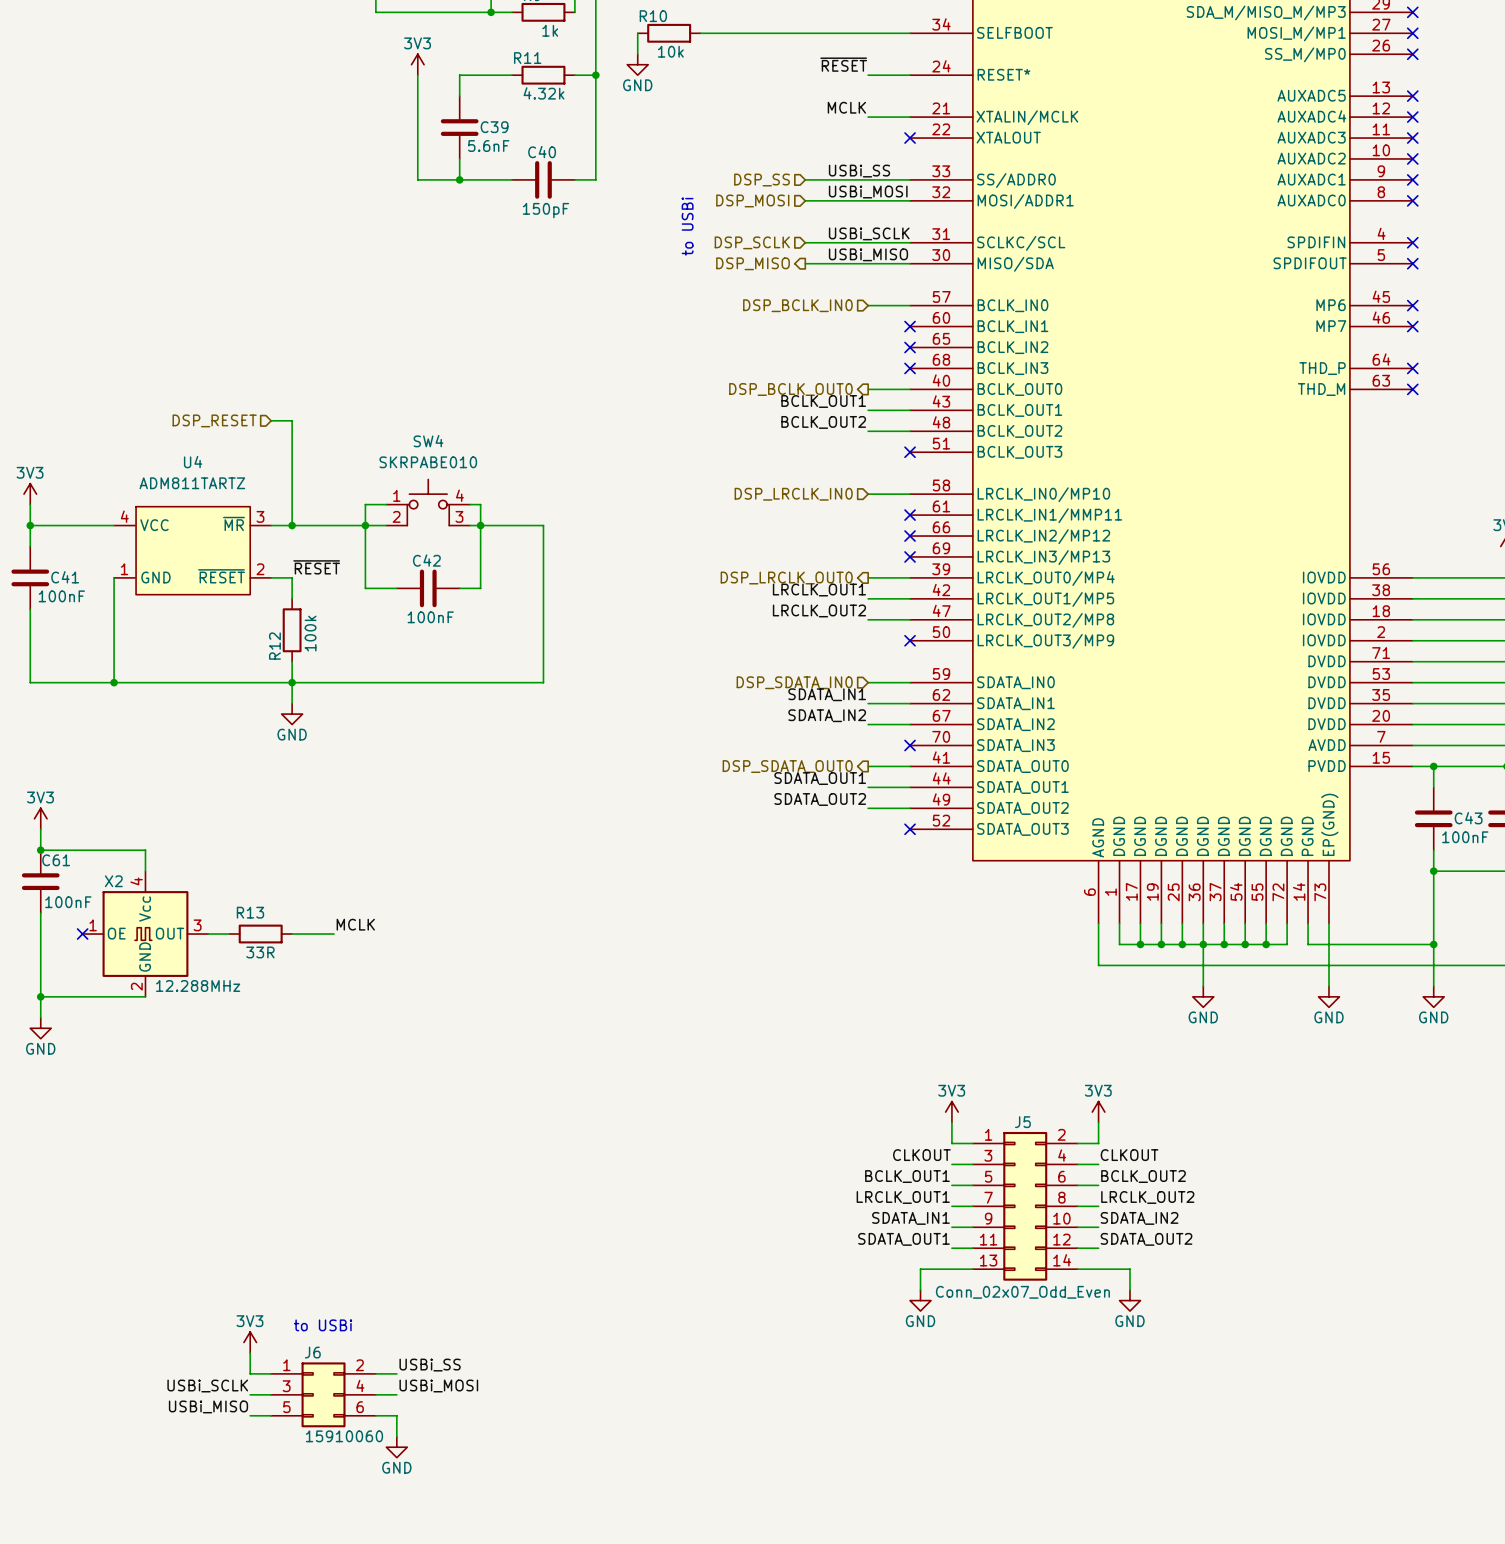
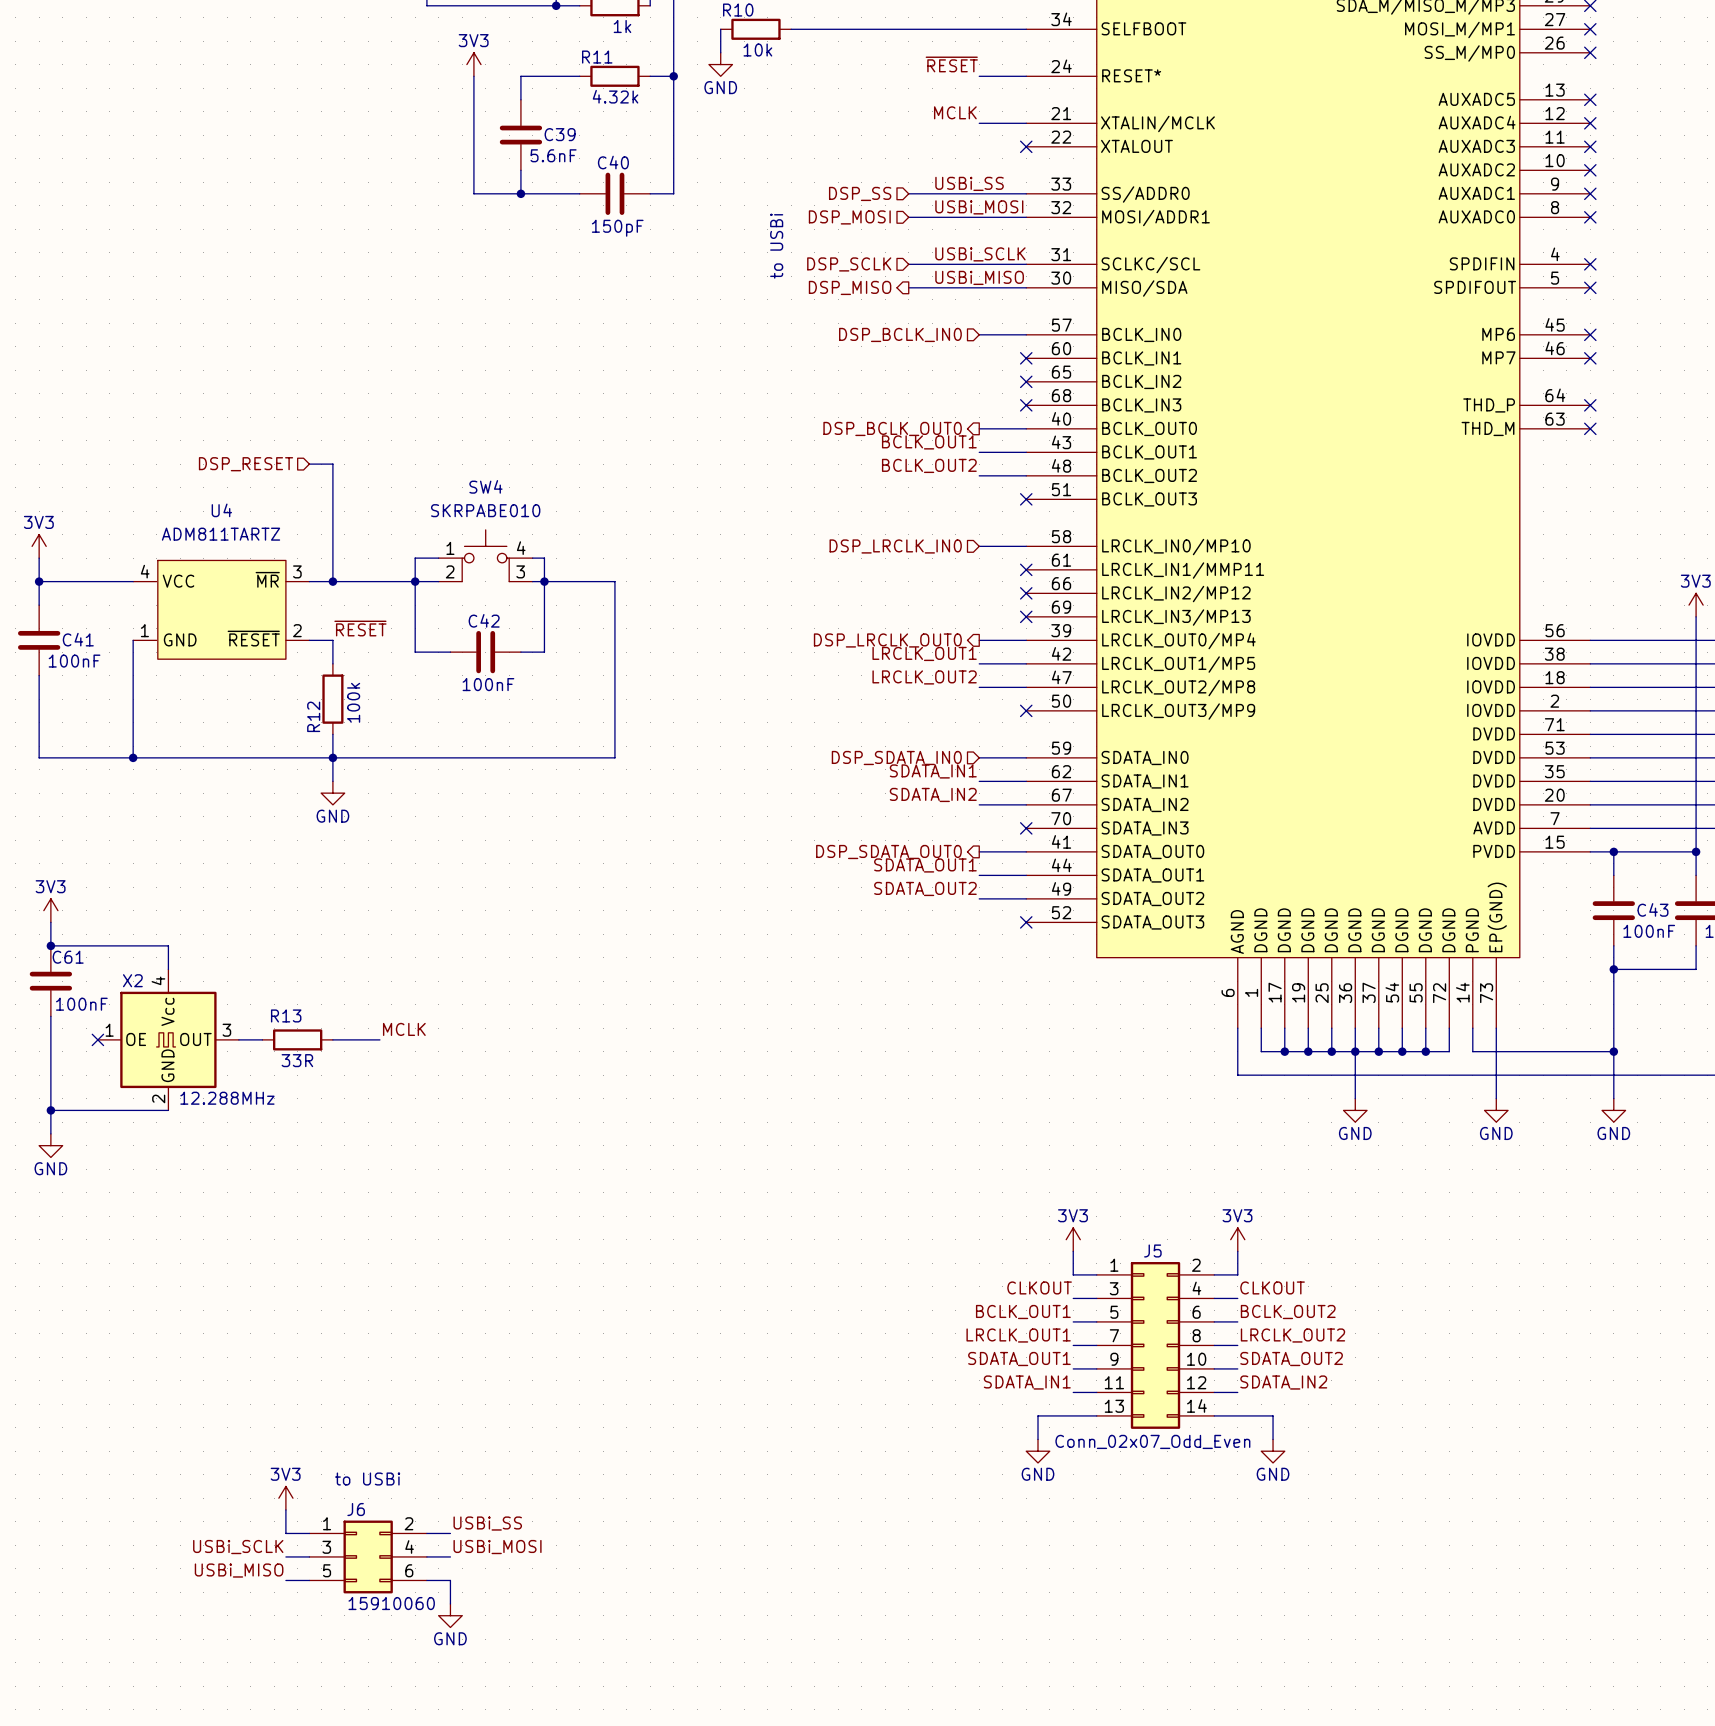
label: SDATA_IN1 (910, 1218) -> SDATA_OUT1 (1019, 1359)
label: SDATA_IN2 (1139, 1218) -> SDATA_OUT2 (1291, 1359)
label: SDATA_OUT1 (903, 1239) -> SDATA_IN1 (1027, 1382)
label: SDATA_OUT2 (1146, 1239) -> SDATA_IN2 (1283, 1382)

